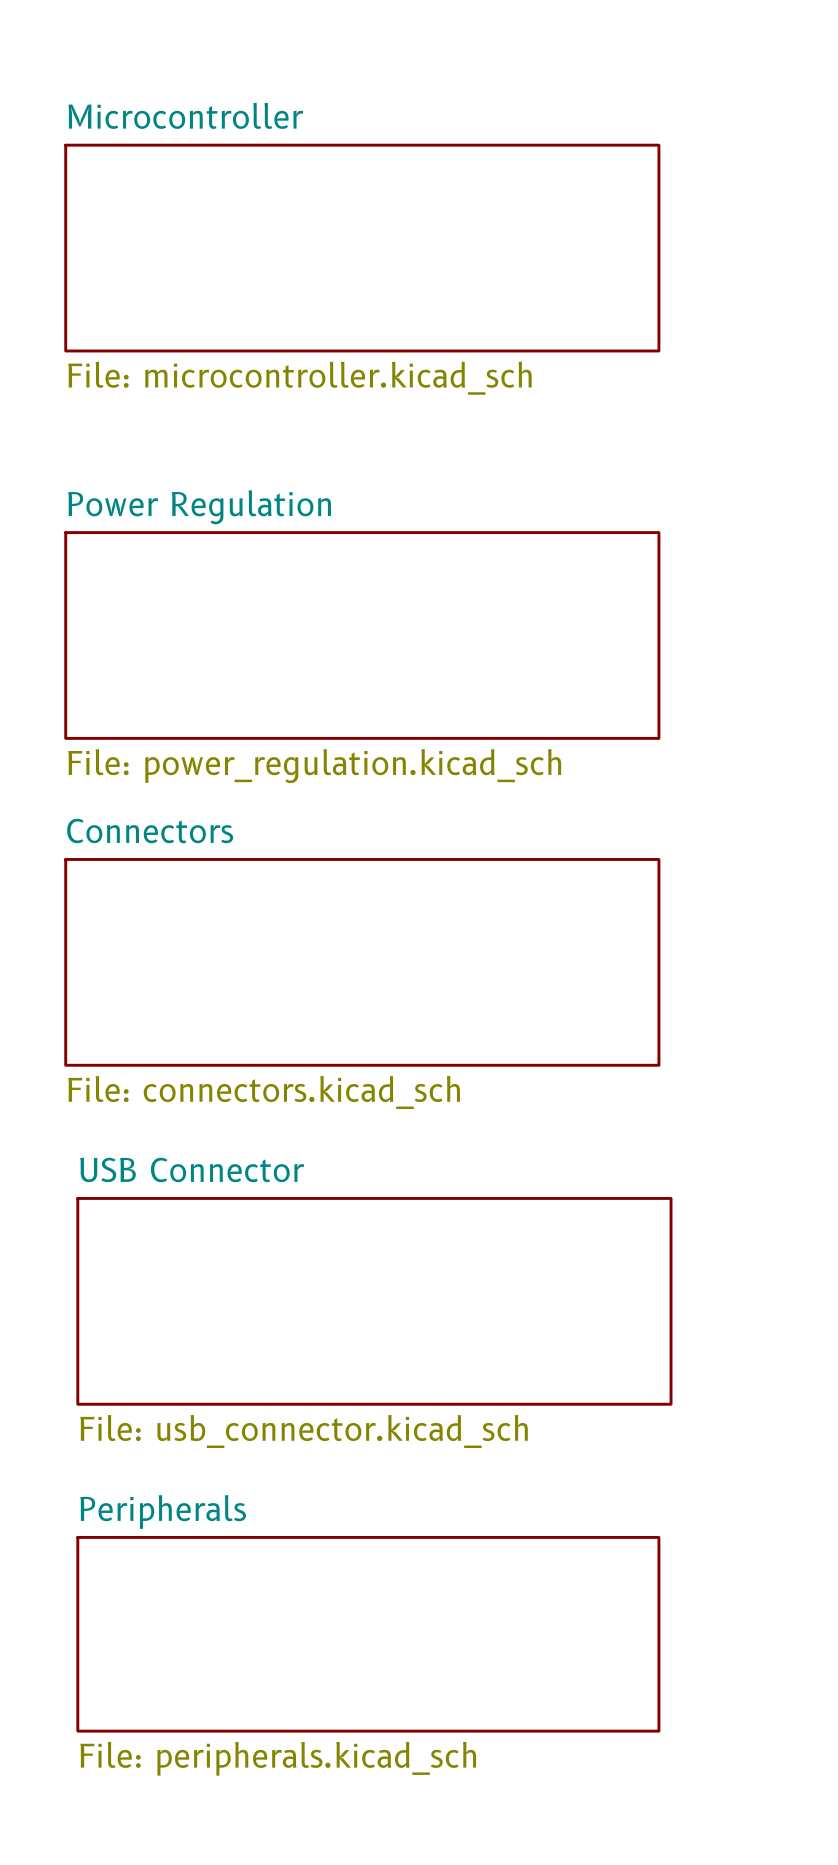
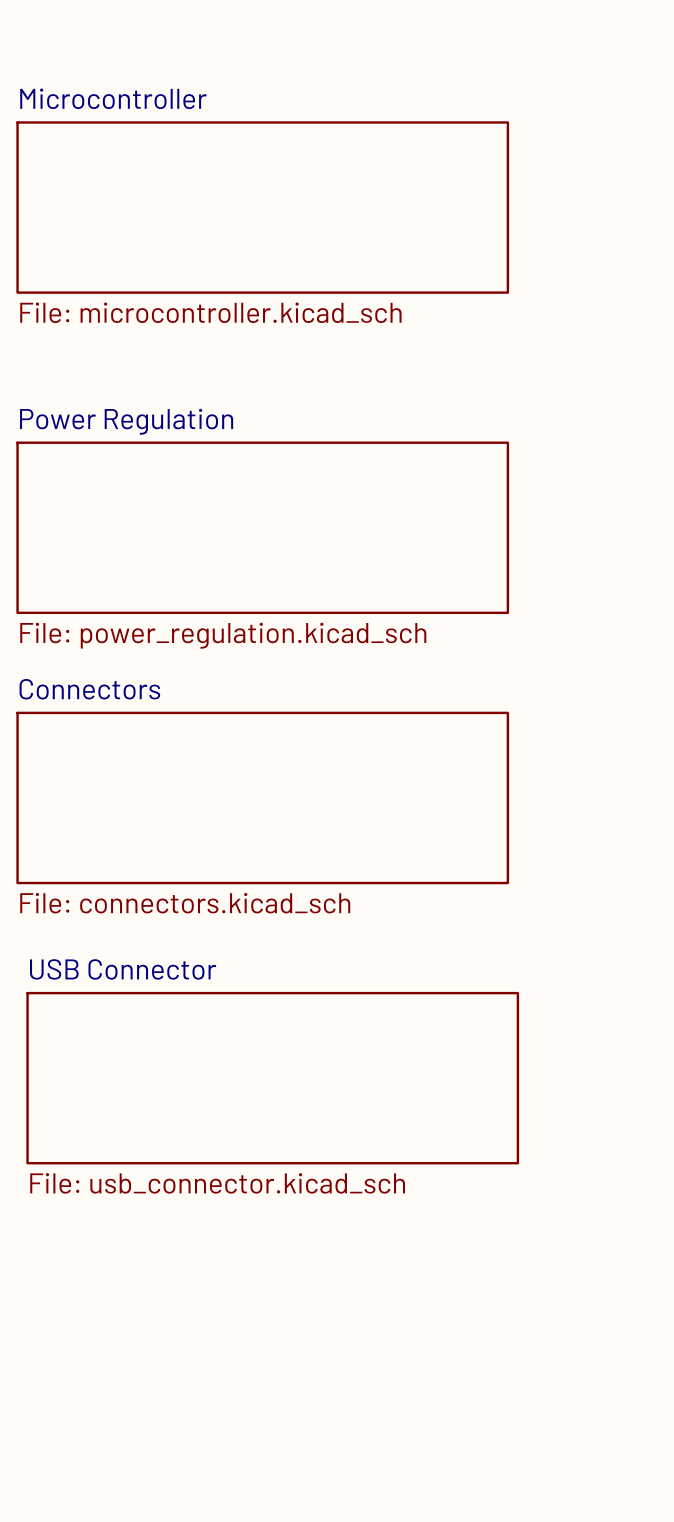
sheet Peripherals: File: peripherals.kicad_sch (368, 1634) -> none

